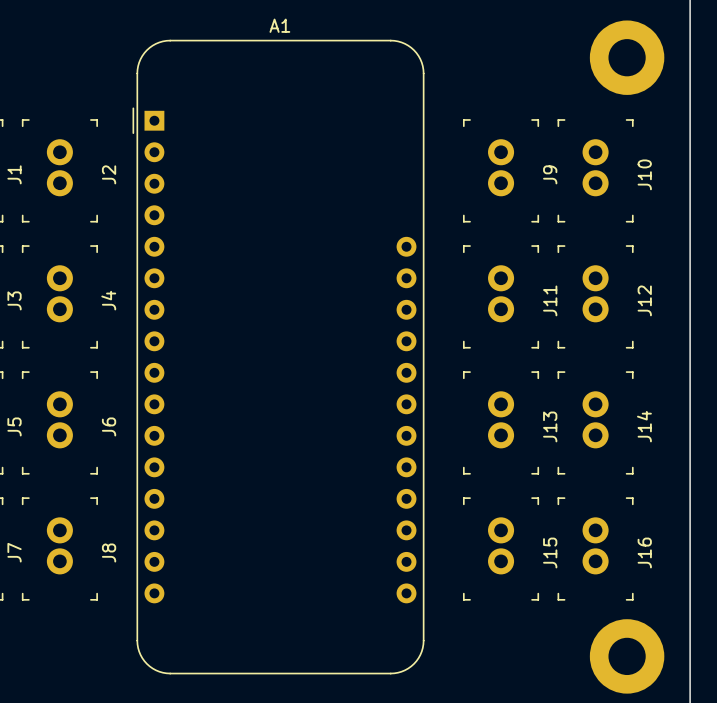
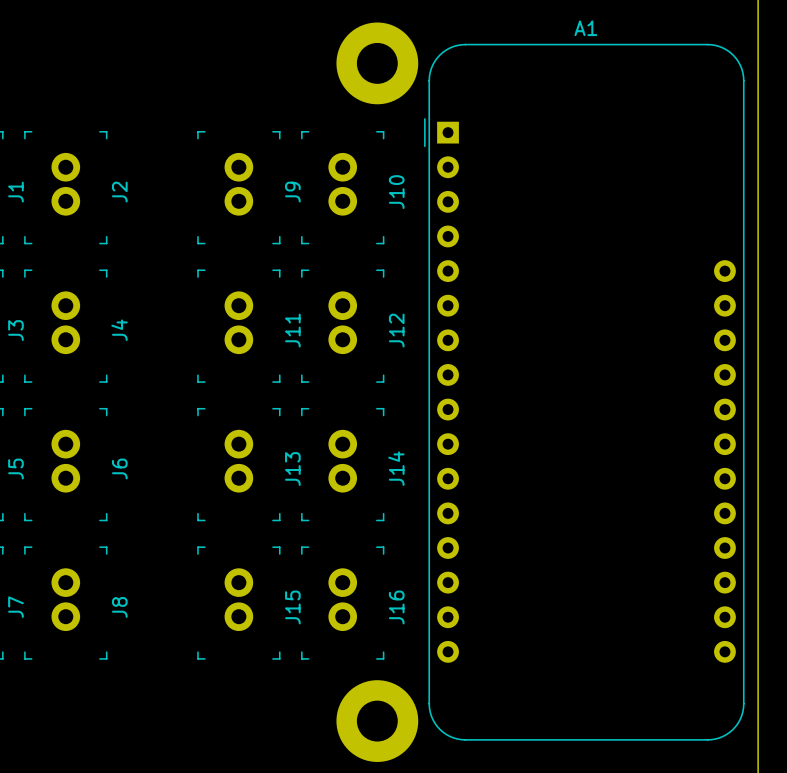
part position: (627, 57) -> (377, 63)
J9 position: (501, 170) -> (238, 187)
J10 position: (595, 170) -> (342, 187)
J11 position: (501, 296) -> (238, 326)
J12 position: (595, 296) -> (342, 326)
A1 position: (278, 357) -> (584, 392)
J13 position: (501, 422) -> (238, 464)
J14 position: (595, 422) -> (342, 464)
J15 position: (501, 548) -> (238, 603)
J16 position: (595, 548) -> (342, 603)
part position: (627, 656) -> (377, 721)

